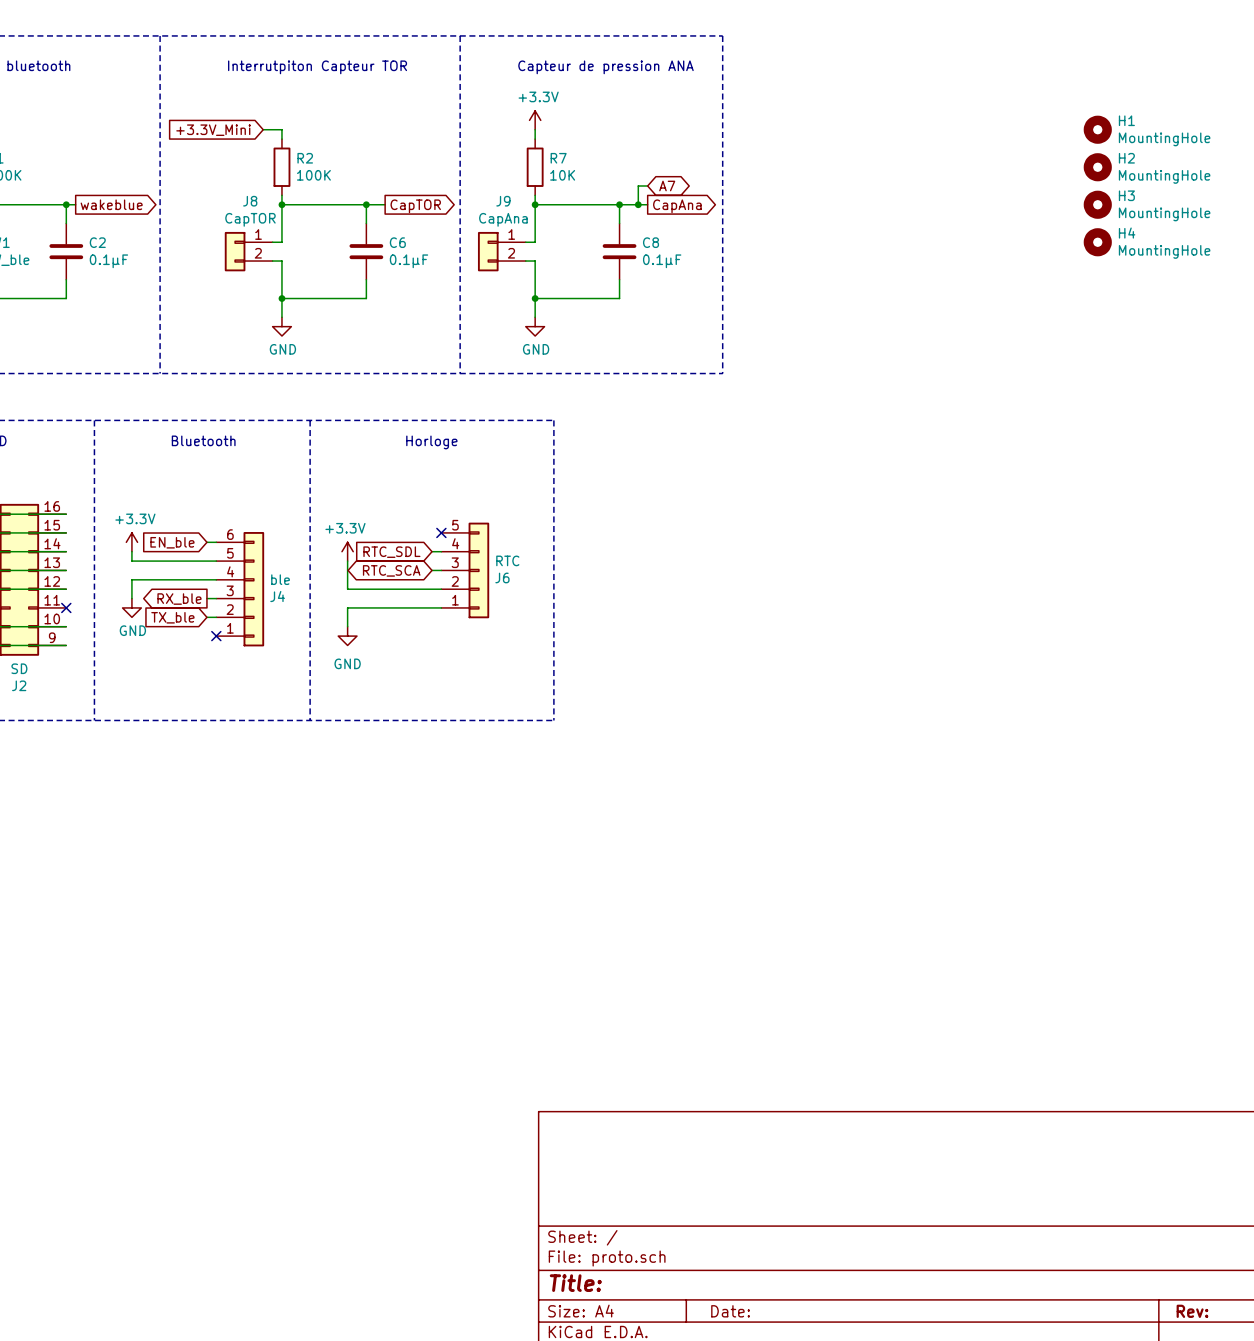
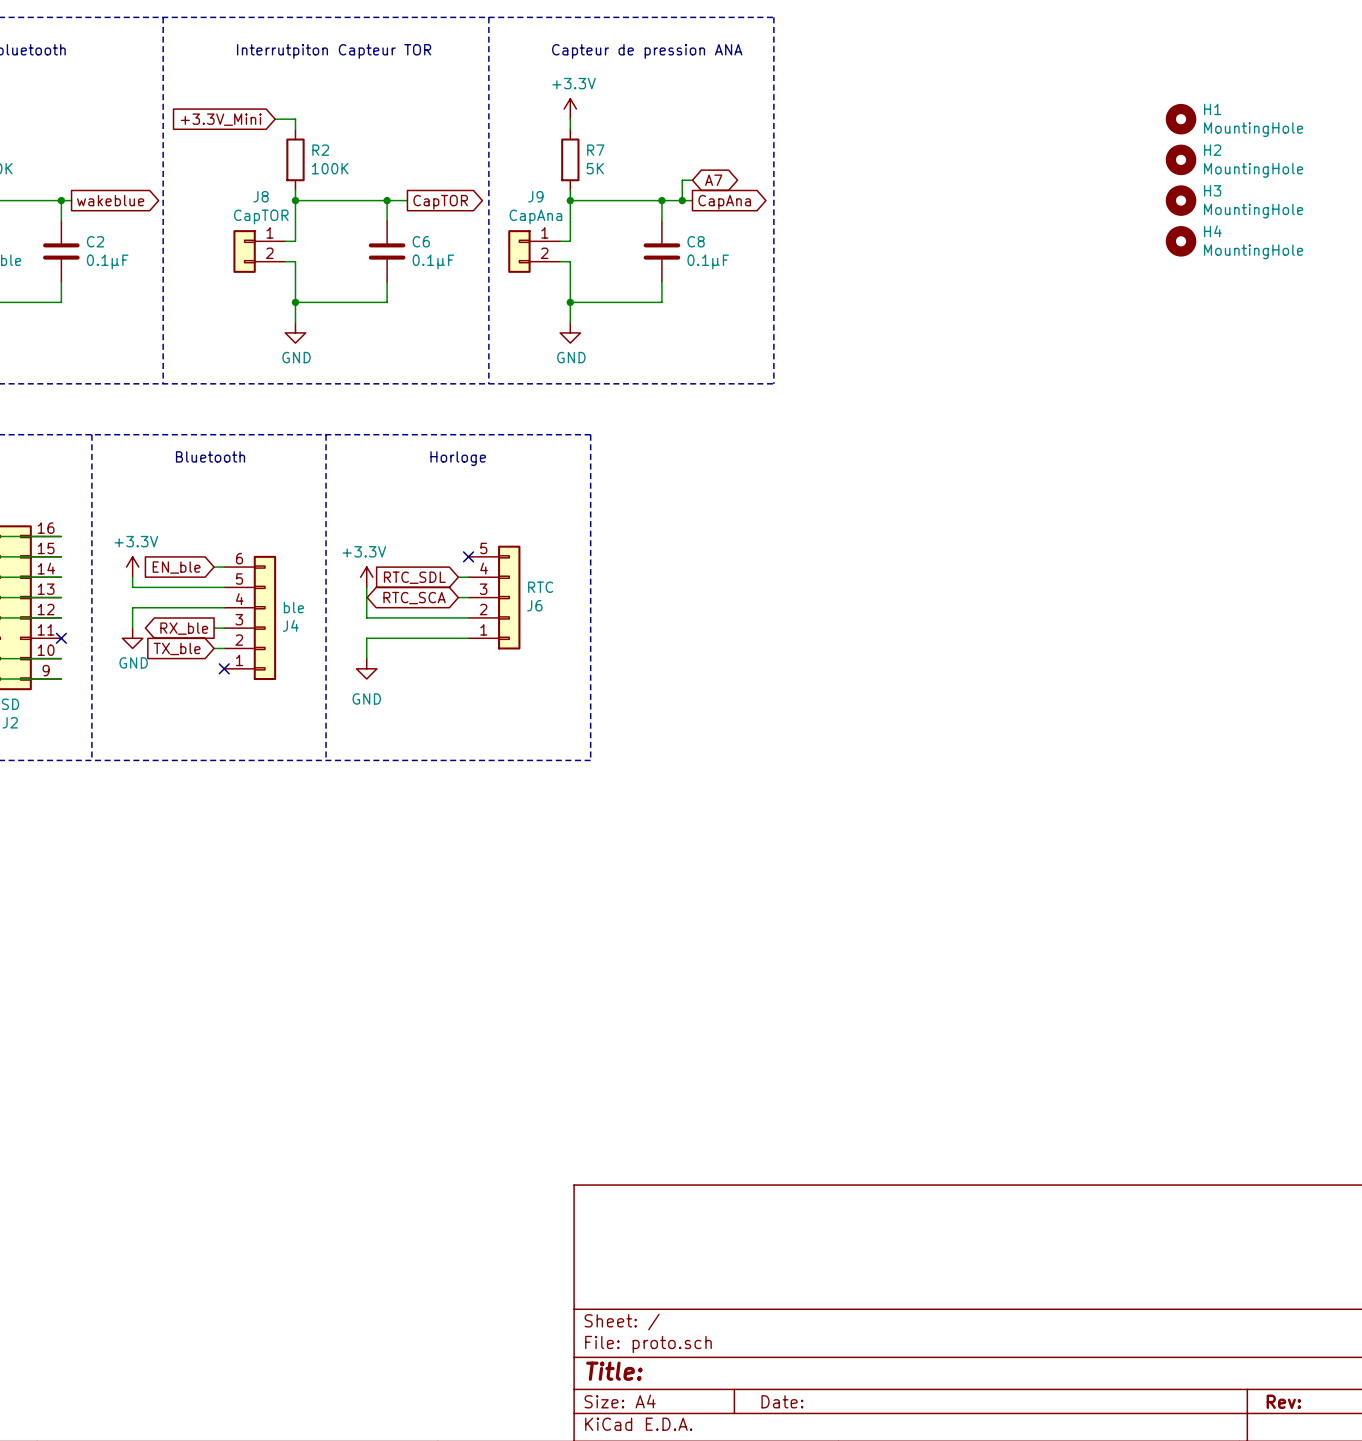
R7 value: 10K (562, 175) -> 5K (595, 168)

